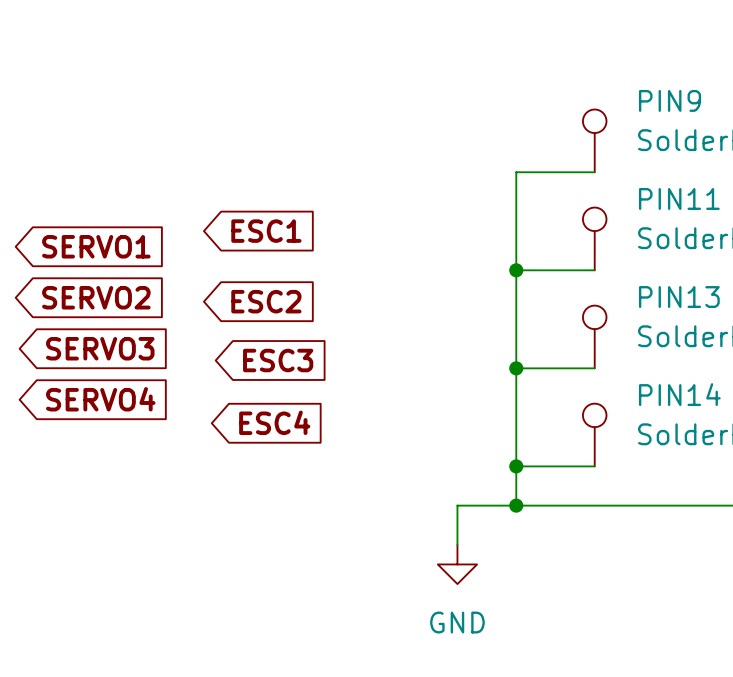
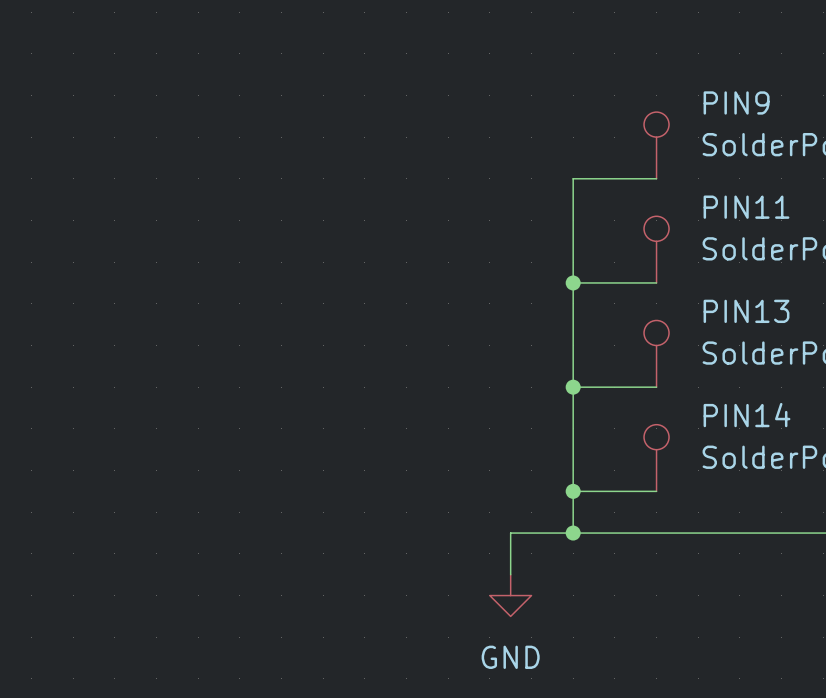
global label: ESC1 (266, 231) -> none
global label: SERVO1 (96, 246) -> none
global label: SERVO2 (96, 297) -> none
global label: ESC2 (266, 301) -> none
global label: SERVO3 (100, 348) -> none
global label: ESC3 (278, 360) -> none
global label: SERVO4 (100, 399) -> none
global label: ESC4 (274, 422) -> none

